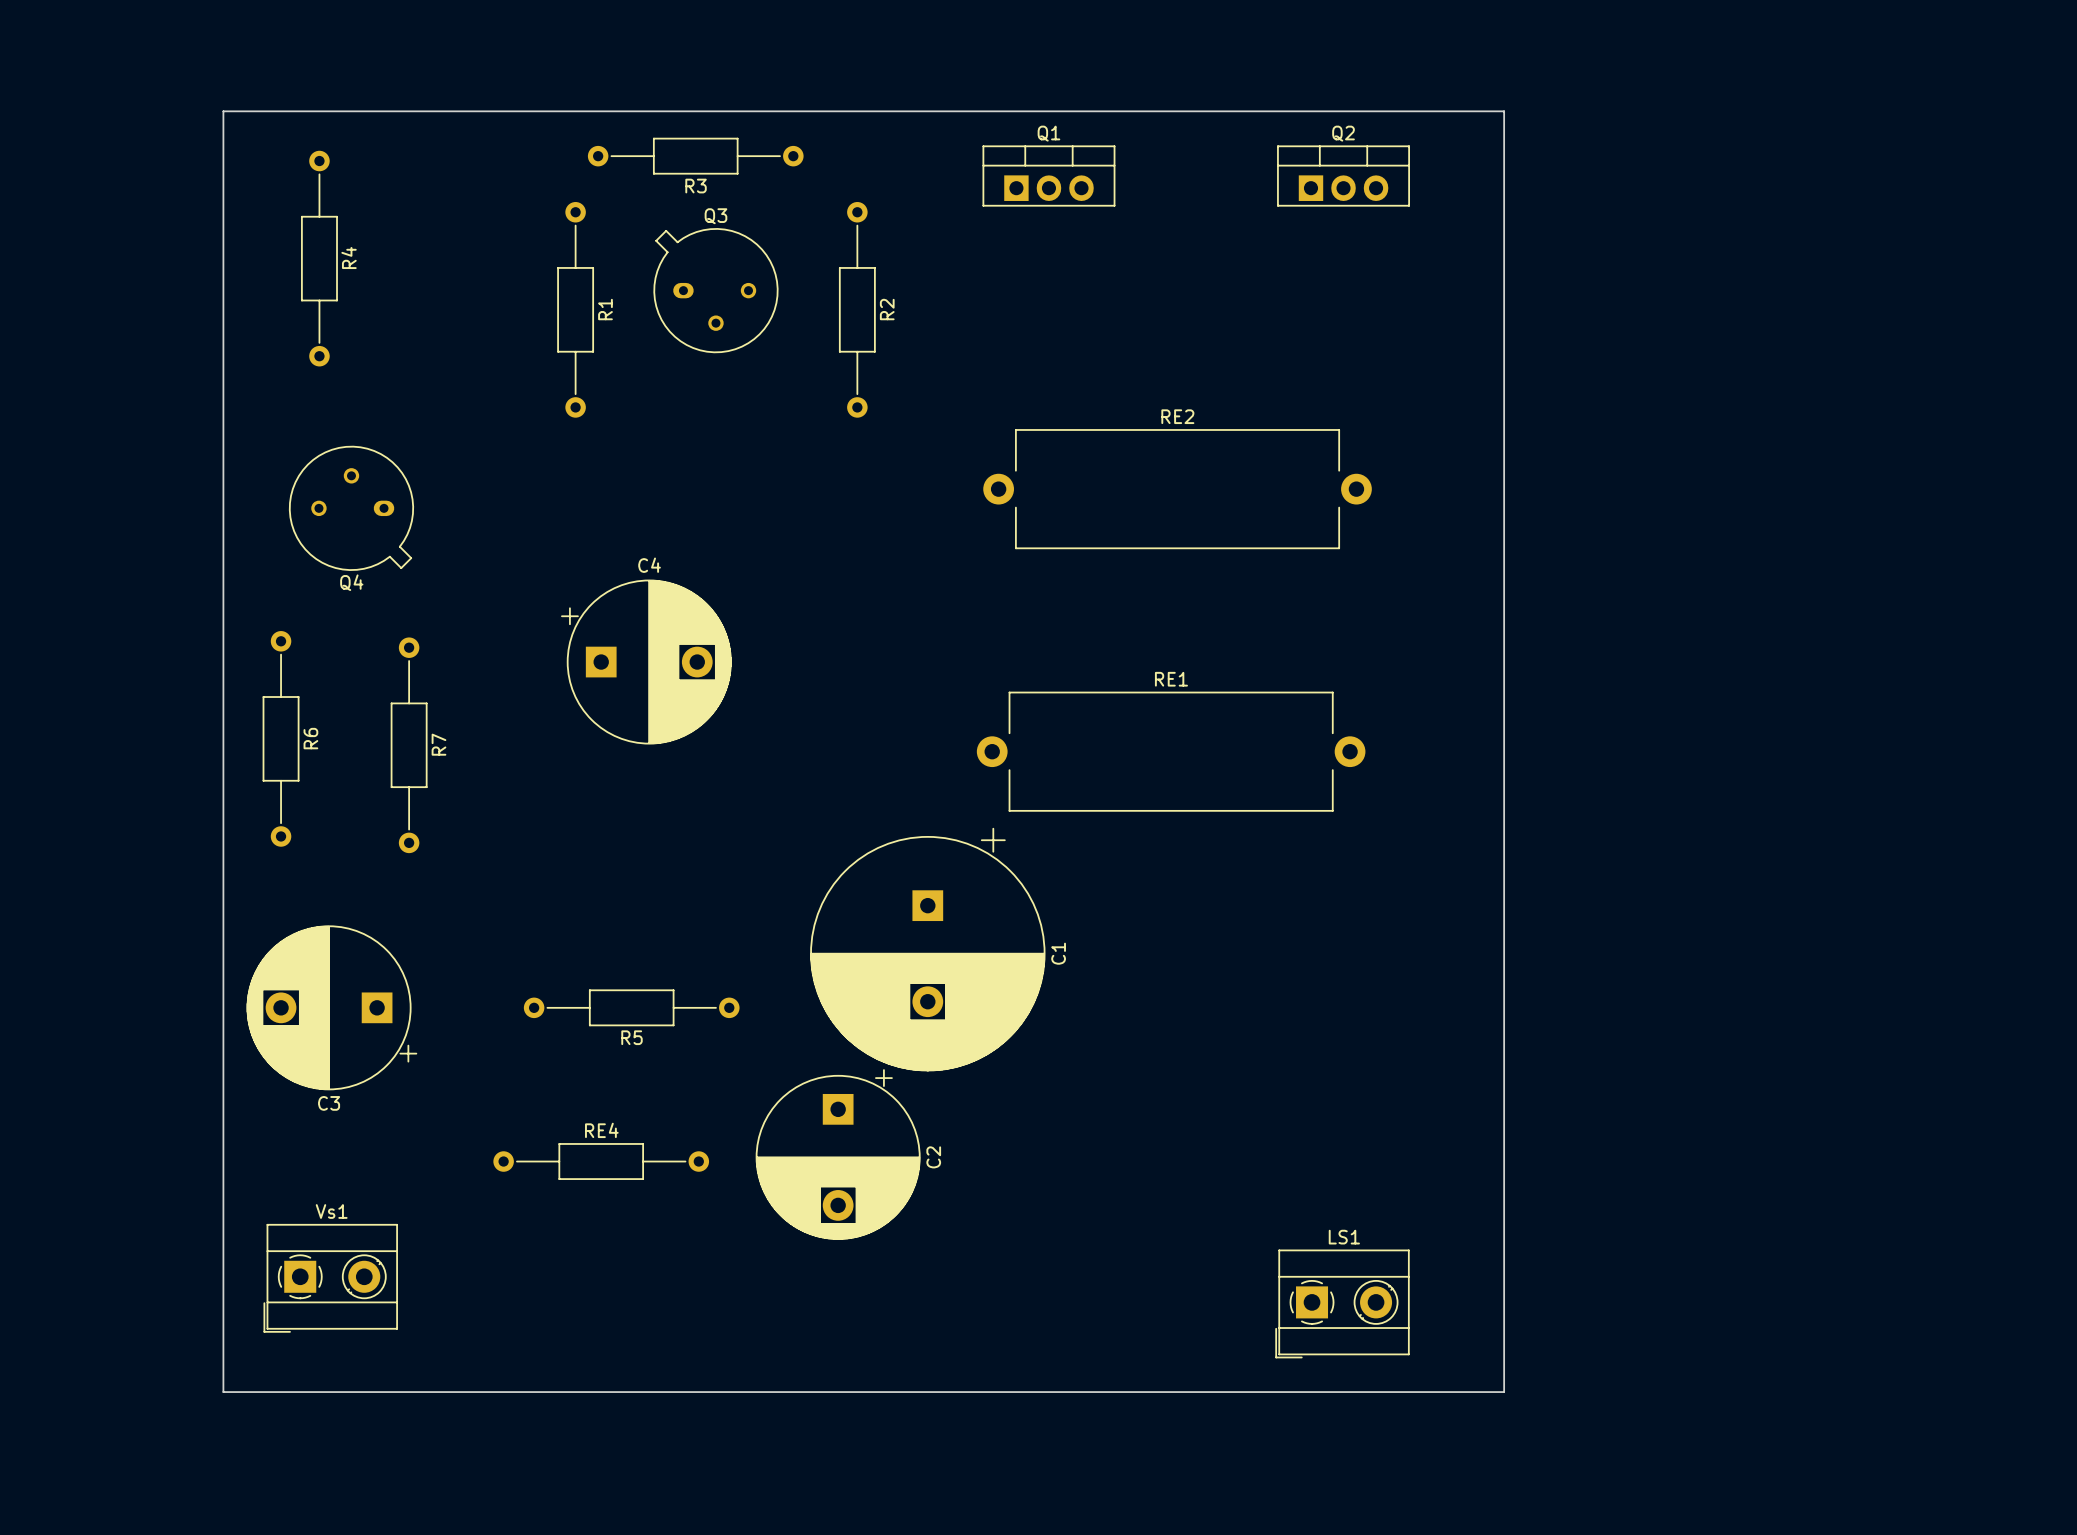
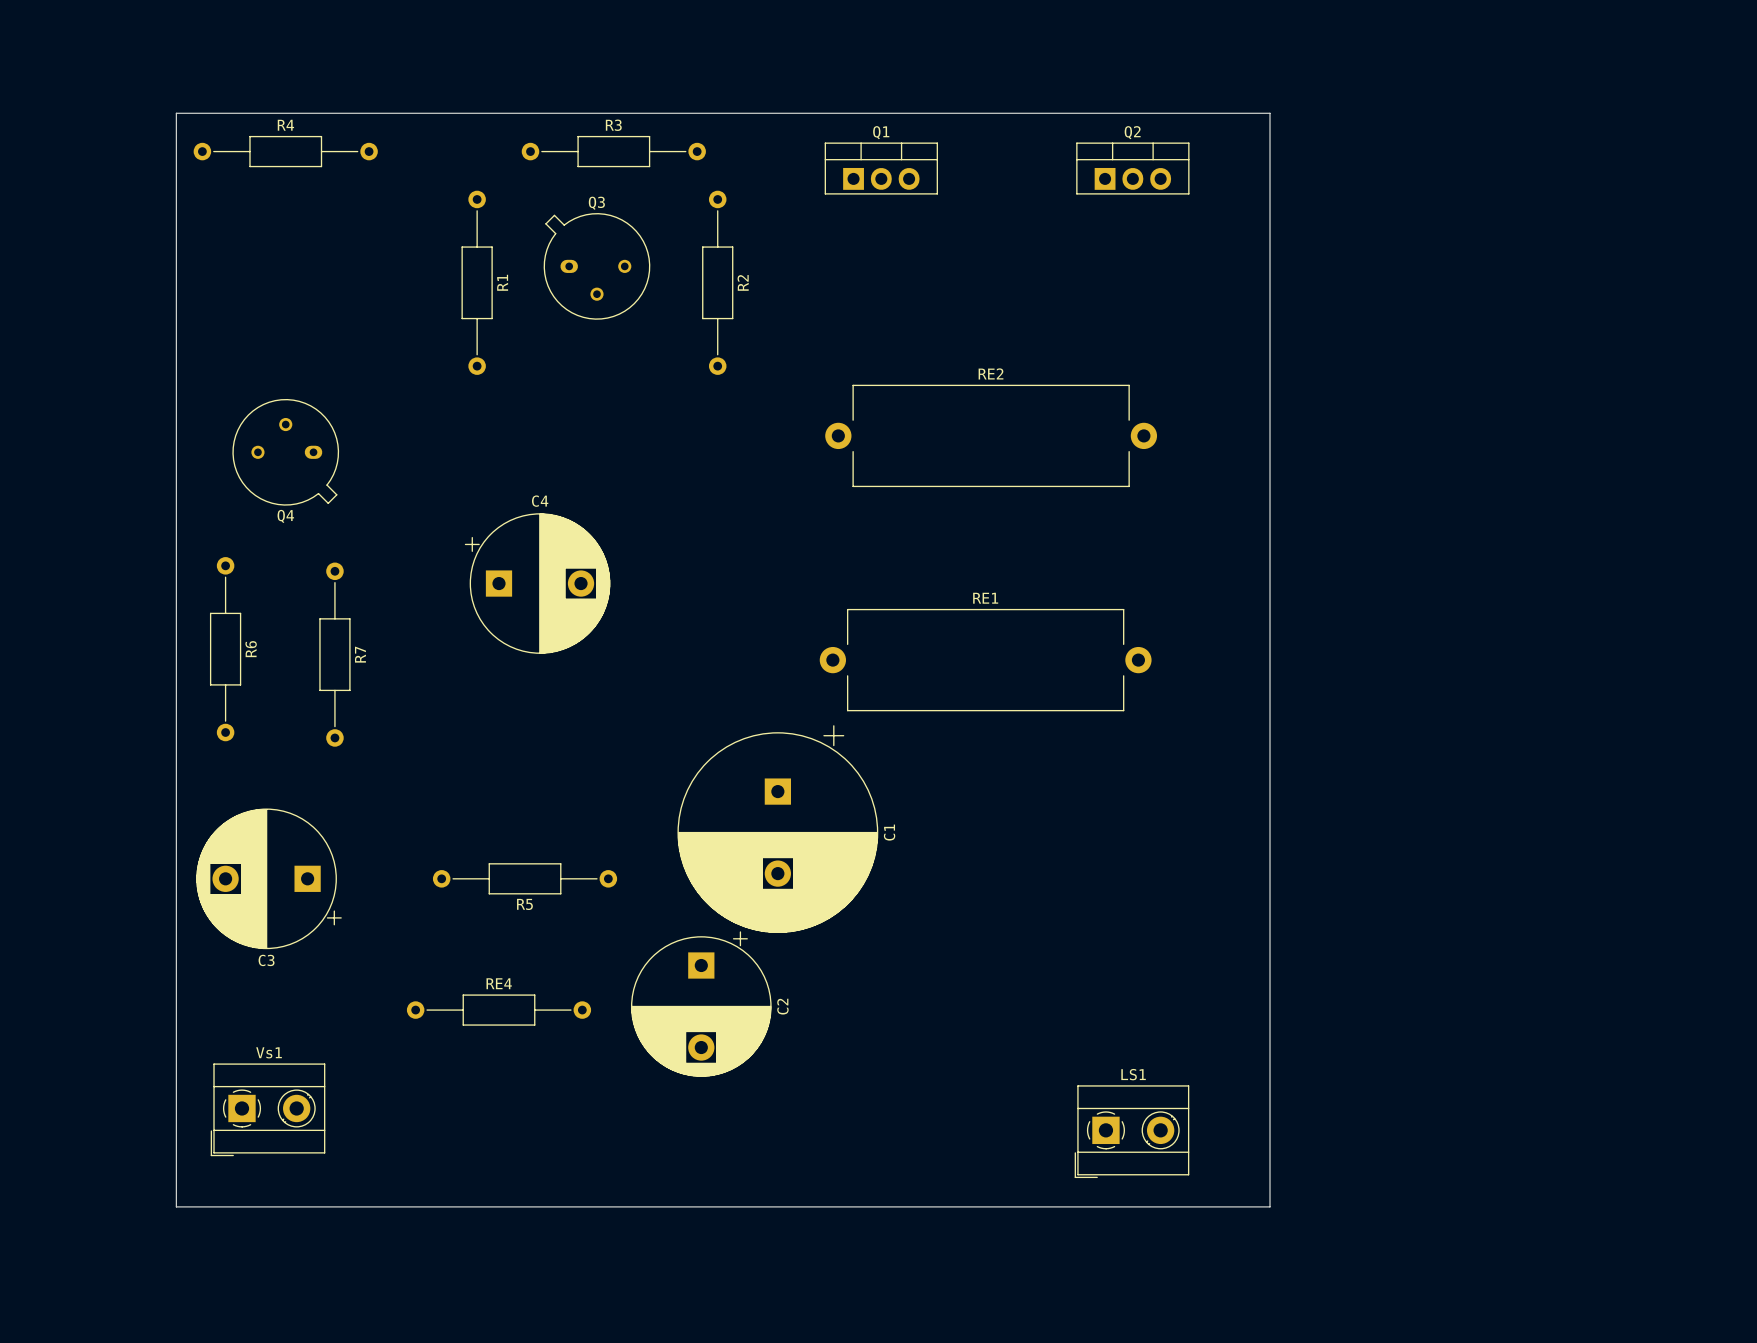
R3 position: (695, 156) -> (613, 151)
R3 name position: R3 (696, 186) -> R3 (613, 125)
R4 rotation: 0° (319, 258) -> 90° clockwise (285, 151)
R4 name position: R4 (349, 258) -> R4 (285, 125)

